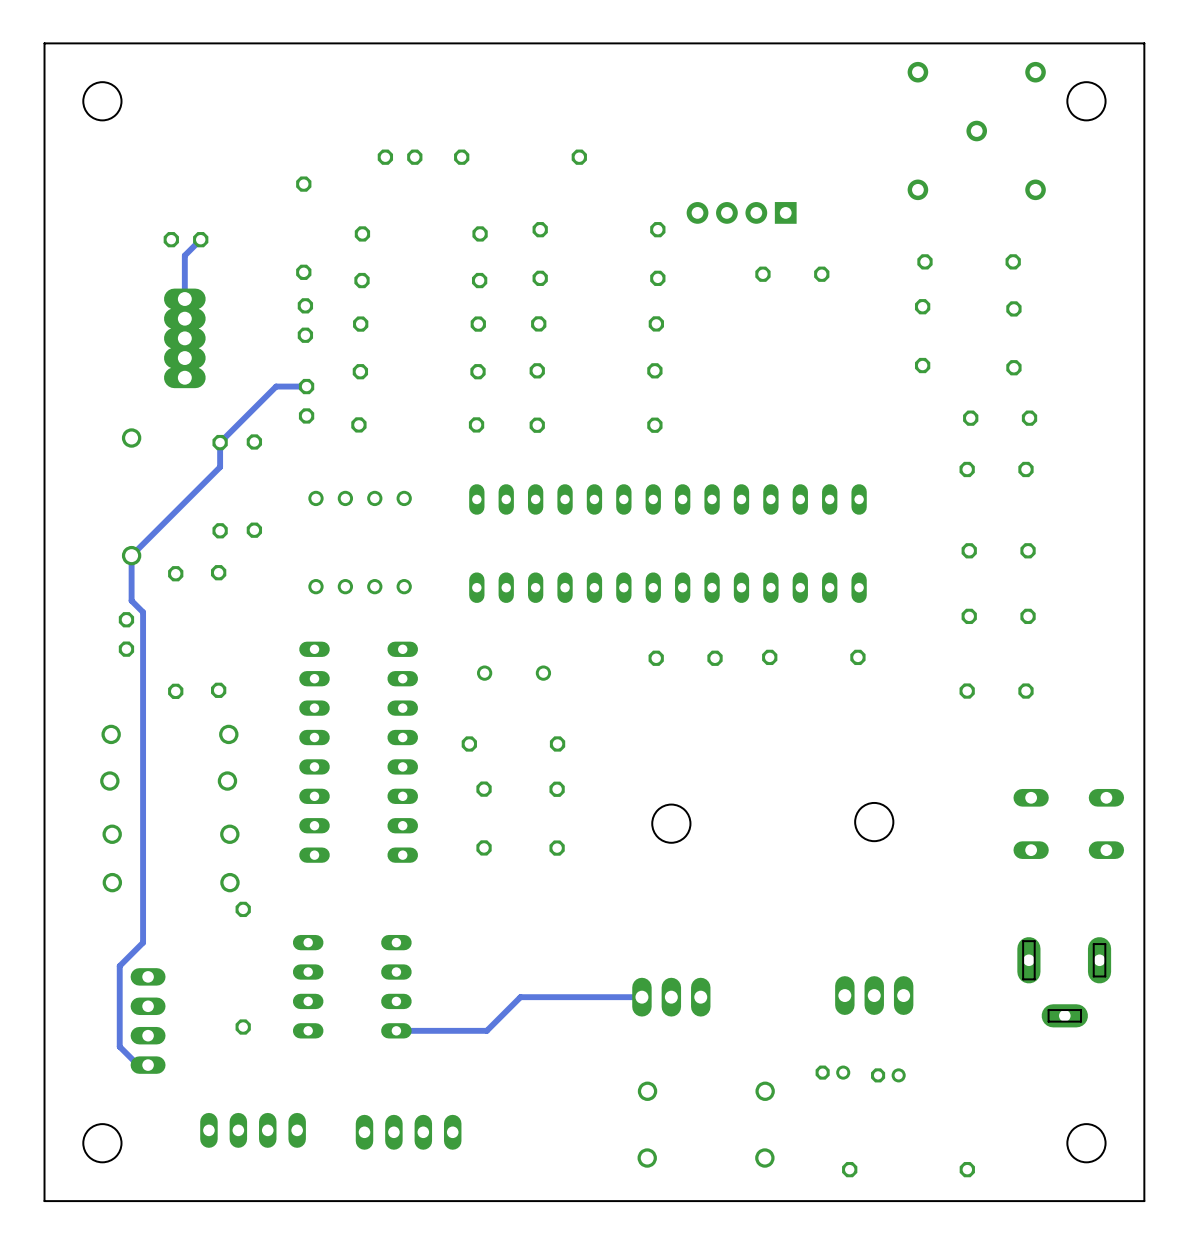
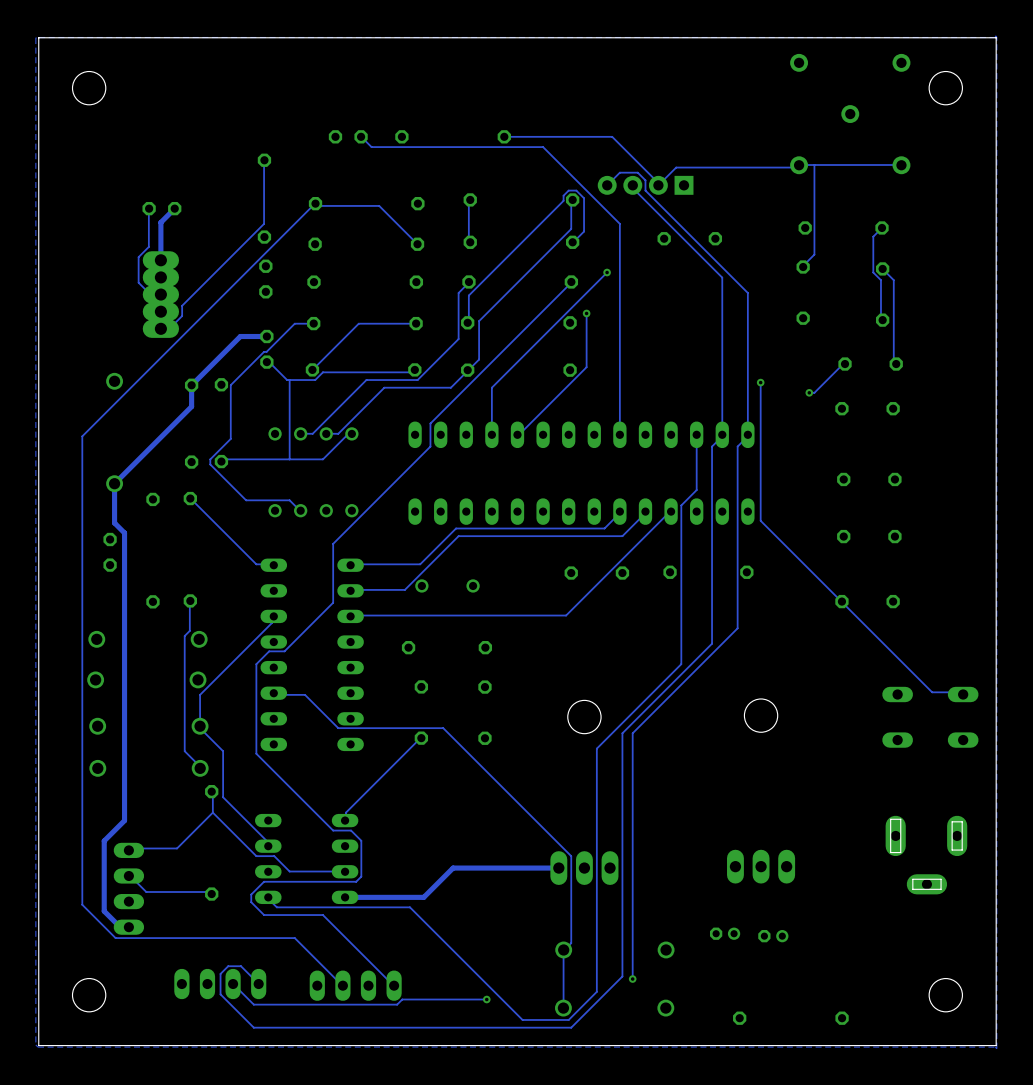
zone outline: none -> (995, 35) (996, 1048) (995, 1047) (38, 1047) (35, 1044) (35, 38) (995, 37) (995, 35)
track: none -> (361, 136) (371, 147) (543, 147) (619, 223) (619, 434)
track: none -> (504, 136) (612, 136) (658, 182) (658, 185) (676, 167) (901, 165)
track: none -> (264, 160) (264, 223) (182, 305) (182, 316) (169, 328) (160, 328)
track: none -> (814, 164) (814, 254) (803, 267)
track: none -> (607, 185) (619, 172) (637, 172) (645, 180) (645, 190) (747, 292) (747, 436) (737, 446) (737, 628) (632, 733) (632, 979)
track: none -> (632, 185) (635, 185) (635, 190) (722, 277) (722, 436) (712, 446) (712, 643) (622, 733) (622, 976) (571, 1027) (253, 1027) (220, 994) (220, 973) (228, 966) (241, 966) (258, 984)
track: none -> (470, 199) (470, 242)
track: none -> (572, 199) (571, 228) (479, 321) (479, 359) (450, 387) (384, 387) (338, 433) (326, 433)
track: none -> (149, 208) (148, 246) (138, 257) (138, 282) (148, 292) (160, 294)
track: none -> (882, 227) (873, 236) (873, 272) (880, 280) (880, 318) (882, 320)
track: none -> (572, 242) (584, 231) (584, 198) (576, 190) (568, 190) (563, 195) (563, 200) (468, 295) (467, 322)
track: none -> (417, 244) (379, 205) (317, 205) (315, 203) (82, 436) (82, 904) (115, 938) (294, 938) (342, 985)
track: none -> (882, 268) (893, 280) (893, 362) (896, 364)
track: none -> (607, 272) (491, 387) (491, 434)
via: none -> (607, 272)
track: none -> (468, 281) (458, 292) (458, 339) (417, 380) (366, 380) (312, 433) (300, 433)
track: none -> (571, 281) (430, 423) (430, 446) (333, 543) (333, 602) (284, 651) (269, 651) (256, 664) (256, 753) (333, 830) (351, 830) (361, 840) (361, 876) (356, 881) (264, 881) (251, 894) (251, 902) (264, 915) (322, 915) (394, 985)
track: none -> (586, 313) (586, 367) (517, 436) (517, 434)
via: none -> (586, 313)
track: none -> (313, 323) (294, 323) (230, 385) (230, 438) (210, 459) (210, 464) (246, 500) (289, 500) (300, 510)
track: none -> (416, 323) (358, 323) (312, 369)
track: none -> (266, 362) (269, 362) (287, 380) (315, 380) (322, 372) (412, 372) (414, 369)
track: none -> (845, 364) (814, 392) (809, 392)
track: none -> (289, 380) (289, 459)
track: none -> (760, 382) (760, 520) (932, 692) (962, 692) (963, 694)
via: none -> (760, 382)
via: none -> (809, 392)
track: none -> (351, 433) (351, 436) (345, 436) (322, 459) (223, 459) (221, 461)
track: none -> (696, 434) (696, 490) (681, 505) (681, 664) (596, 748) (596, 991) (568, 1019) (522, 1019) (409, 907) (276, 907) (268, 897)
track: none -> (190, 498) (256, 564) (273, 565)
track: none -> (619, 511) (604, 528) (456, 528) (420, 564) (350, 565)
track: none -> (645, 511) (622, 536) (458, 536) (404, 589) (350, 590)
track: none -> (671, 511) (566, 615) (350, 616)
track: none -> (190, 600) (189, 630) (184, 636) (184, 751) (200, 768)
track: none -> (273, 616) (271, 623) (200, 694) (200, 728) (223, 751) (223, 797) (266, 840) (266, 845) (268, 846)
track: none -> (273, 693) (274, 694) (305, 694) (338, 728) (443, 728) (571, 856) (571, 943) (563, 950) (563, 1008)
track: none -> (421, 738) (345, 812) (345, 820)
track: none -> (211, 791) (212, 812)
track: none -> (212, 812) (256, 856) (274, 856) (289, 871) (345, 871)
track: none -> (212, 812) (177, 848) (130, 848) (128, 850)
track: none -> (128, 875) (146, 891) (210, 891) (211, 894)
via: none -> (632, 979)
track: none -> (233, 984) (253, 1004) (397, 1004) (402, 999) (486, 999)
via: none -> (486, 999)

